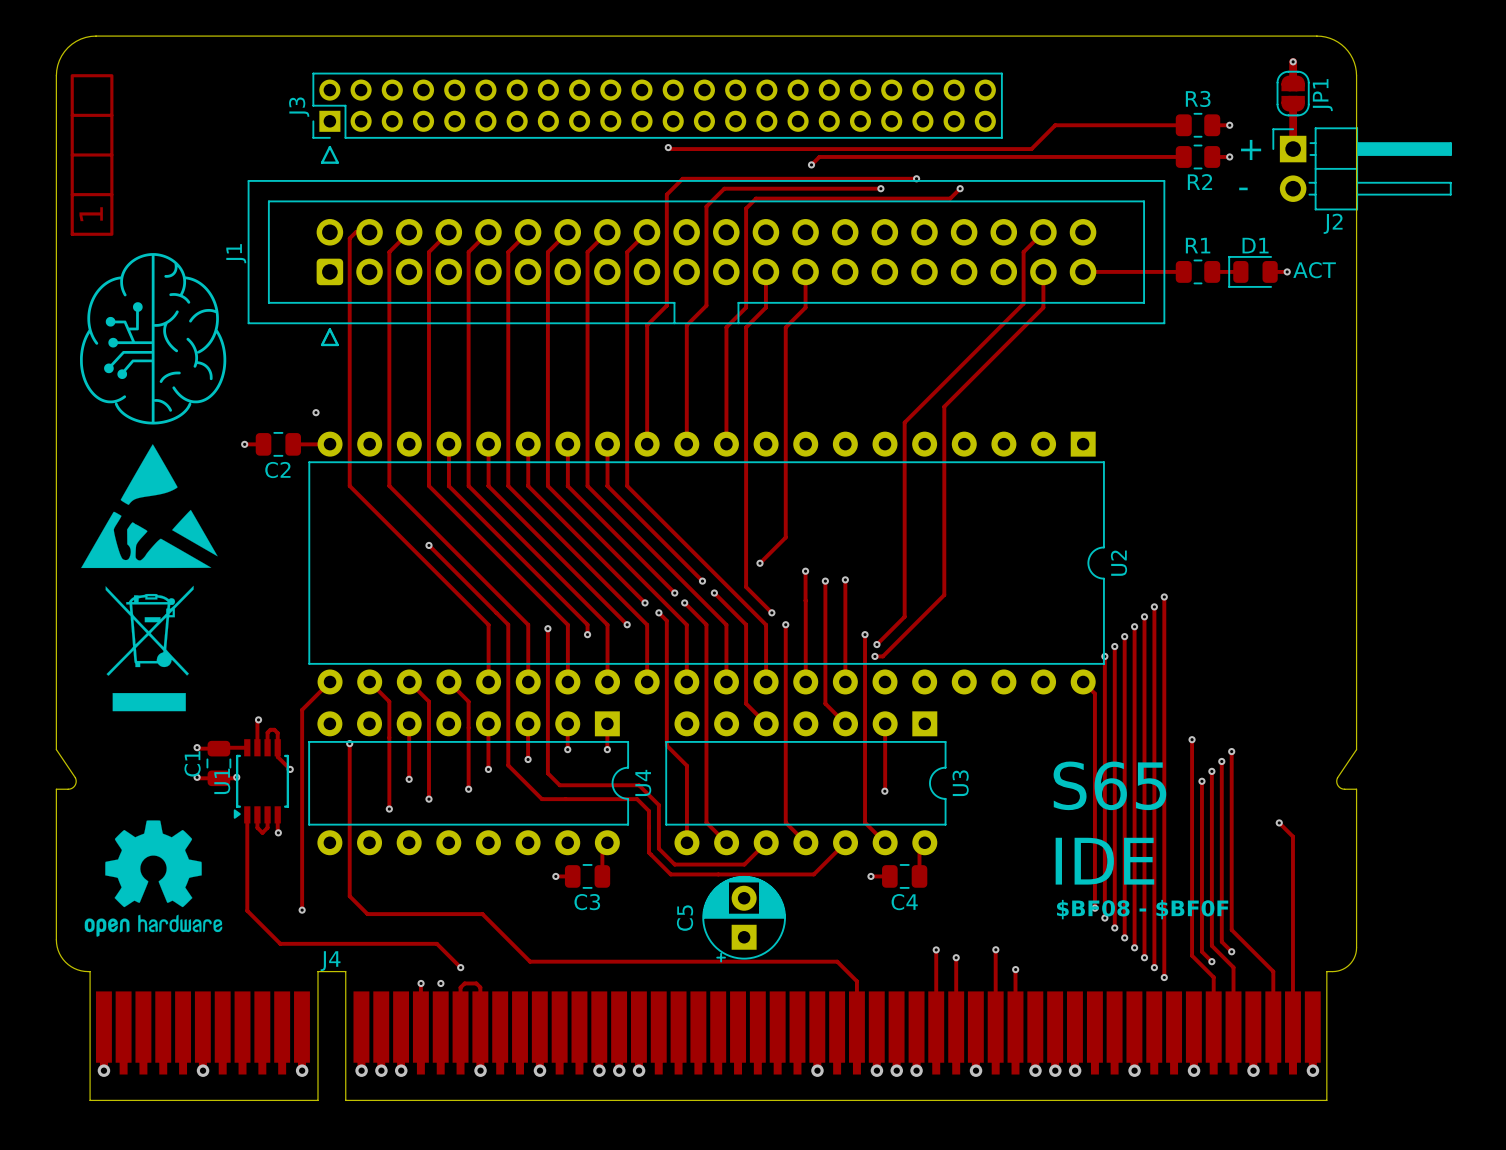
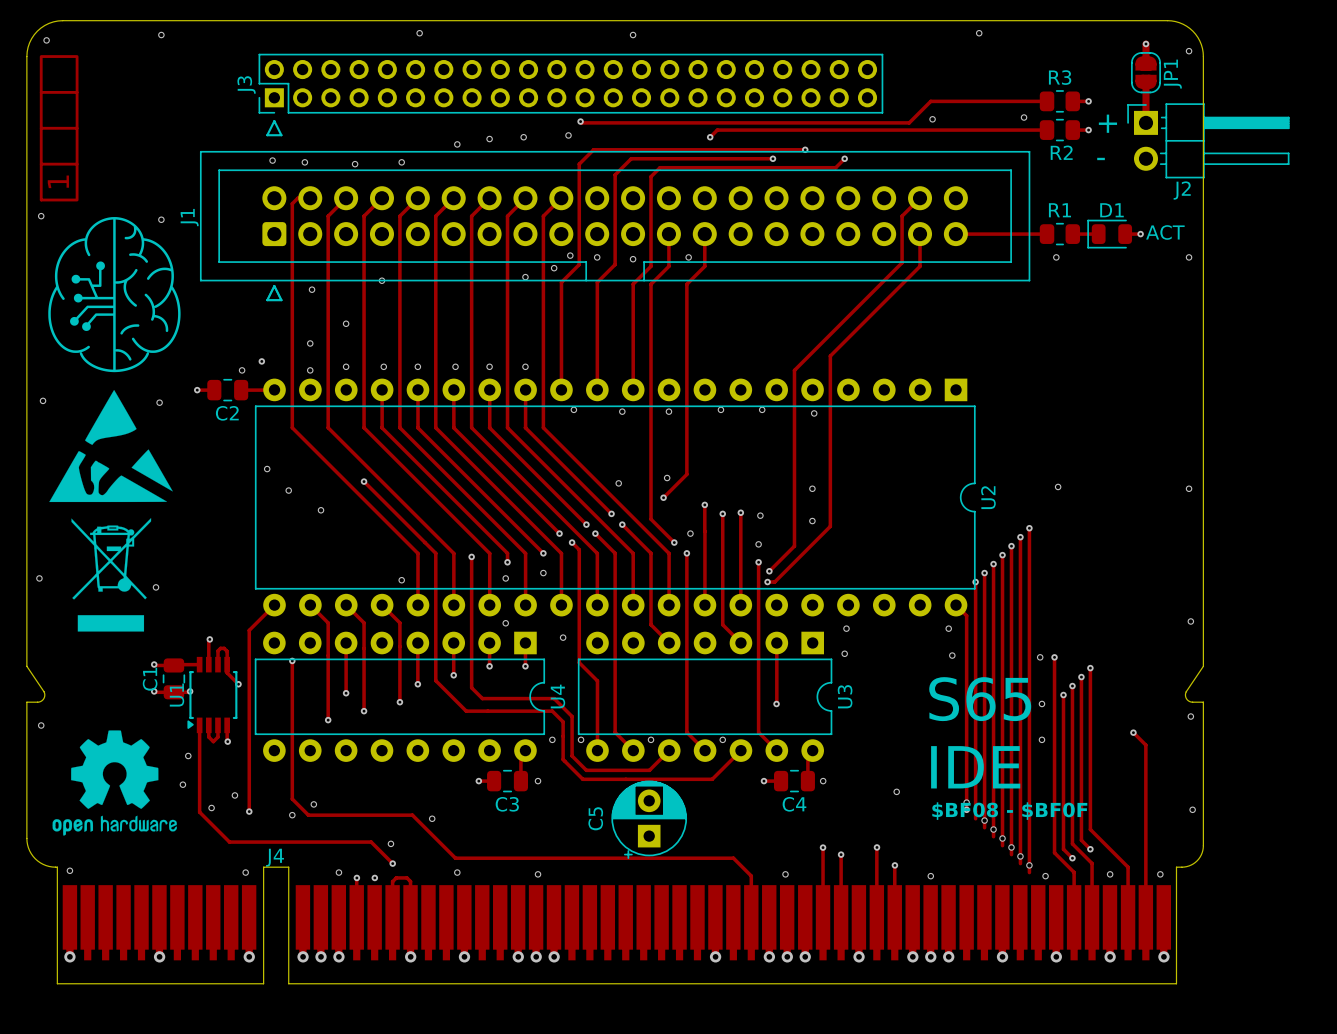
via: none -> (419, 33)
via: none -> (979, 33)
via: none -> (161, 35)
via: none -> (633, 35)
via: none -> (46, 40)
via: none -> (1189, 51)
via: none -> (1024, 117)
via: none -> (932, 119)
via: none -> (568, 135)
via: none -> (523, 137)
via: none -> (489, 139)
via: none -> (457, 144)
via: none -> (272, 160)
via: none -> (304, 162)
via: none -> (401, 162)
via: none -> (355, 164)
via: none -> (41, 216)
via: none -> (161, 219)
via: none -> (570, 255)
via: none -> (597, 257)
via: none -> (688, 257)
via: none -> (1056, 257)
via: none -> (1189, 257)
via: none -> (633, 259)
via: none -> (554, 268)
via: none -> (525, 277)
via: none -> (381, 280)
via: none -> (312, 289)
via: none -> (346, 323)
via: none -> (310, 343)
via: none -> (346, 366)
via: none -> (383, 366)
via: none -> (417, 366)
via: none -> (455, 366)
via: none -> (489, 366)
via: none -> (525, 366)
via: none -> (242, 370)
via: none -> (310, 370)
via: none -> (43, 400)
via: none -> (159, 402)
via: none -> (573, 409)
via: none -> (720, 409)
via: none -> (762, 409)
via: none -> (622, 411)
via: none -> (668, 411)
via: none -> (814, 413)
via: none -> (267, 469)
via: none -> (667, 478)
via: none -> (618, 483)
via: none -> (1058, 486)
via: none -> (812, 488)
via: none -> (1189, 488)
via: none -> (288, 490)
via: none -> (321, 510)
via: none -> (760, 515)
via: none -> (812, 521)
via: none -> (690, 533)
via: none -> (758, 544)
via: none -> (543, 573)
via: none -> (39, 578)
via: none -> (505, 578)
via: none -> (401, 580)
via: none -> (156, 587)
via: none -> (1190, 621)
via: none -> (505, 623)
via: none -> (846, 628)
via: none -> (948, 628)
via: none -> (563, 637)
via: none -> (844, 653)
via: none -> (952, 655)
via: none -> (1040, 657)
via: none -> (1041, 703)
via: none -> (1190, 716)
via: none -> (41, 725)
via: none -> (552, 739)
via: none -> (581, 739)
via: none -> (651, 739)
via: none -> (722, 739)
via: none -> (1041, 739)
via: none -> (188, 755)
via: none -> (538, 781)
via: none -> (823, 781)
via: none -> (182, 784)
via: none -> (896, 791)
via: none -> (234, 795)
via: none -> (966, 802)
via: none -> (313, 804)
via: none -> (211, 808)
via: none -> (1192, 809)
via: none -> (292, 815)
via: none -> (432, 818)
via: (1104, 918) -> none
via: none -> (984, 820)
via: (1114, 927) -> none
via: none -> (993, 829)
via: (1124, 937) -> none
via: none -> (1002, 838)
via: none -> (390, 843)
via: (1134, 947) -> none
via: none -> (1011, 847)
via: (1144, 957) -> none
via: none -> (1020, 856)
via: (1154, 967) -> none
via: none -> (1029, 865)
via: none -> (69, 870)
via: none -> (245, 872)
via: none -> (338, 872)
via: none -> (457, 872)
via: (1164, 977) -> none
via: none -> (538, 874)
via: none -> (785, 874)
via: none -> (1110, 874)
via: none -> (1160, 874)
via: none -> (930, 876)
via: none -> (1045, 876)

